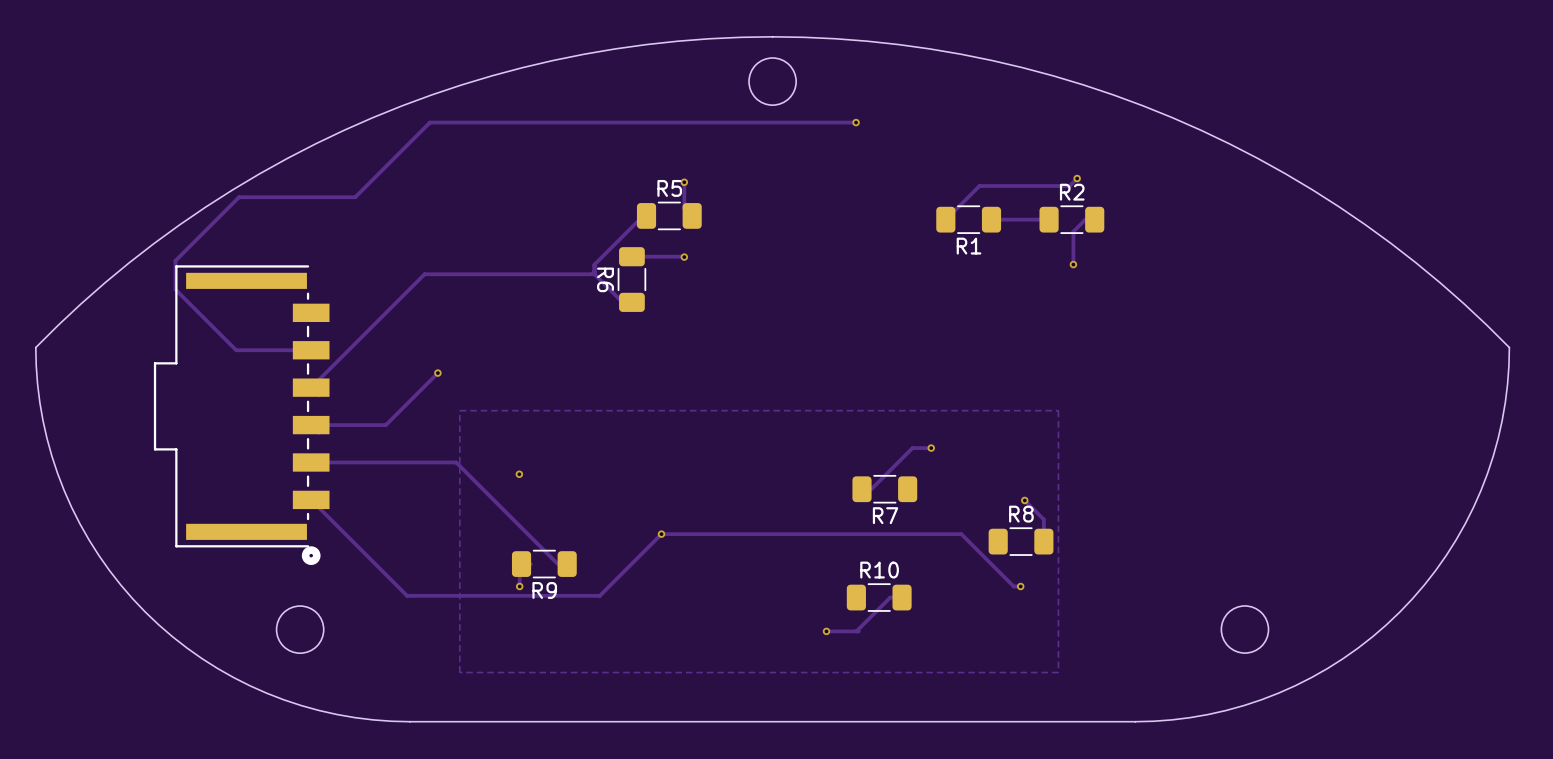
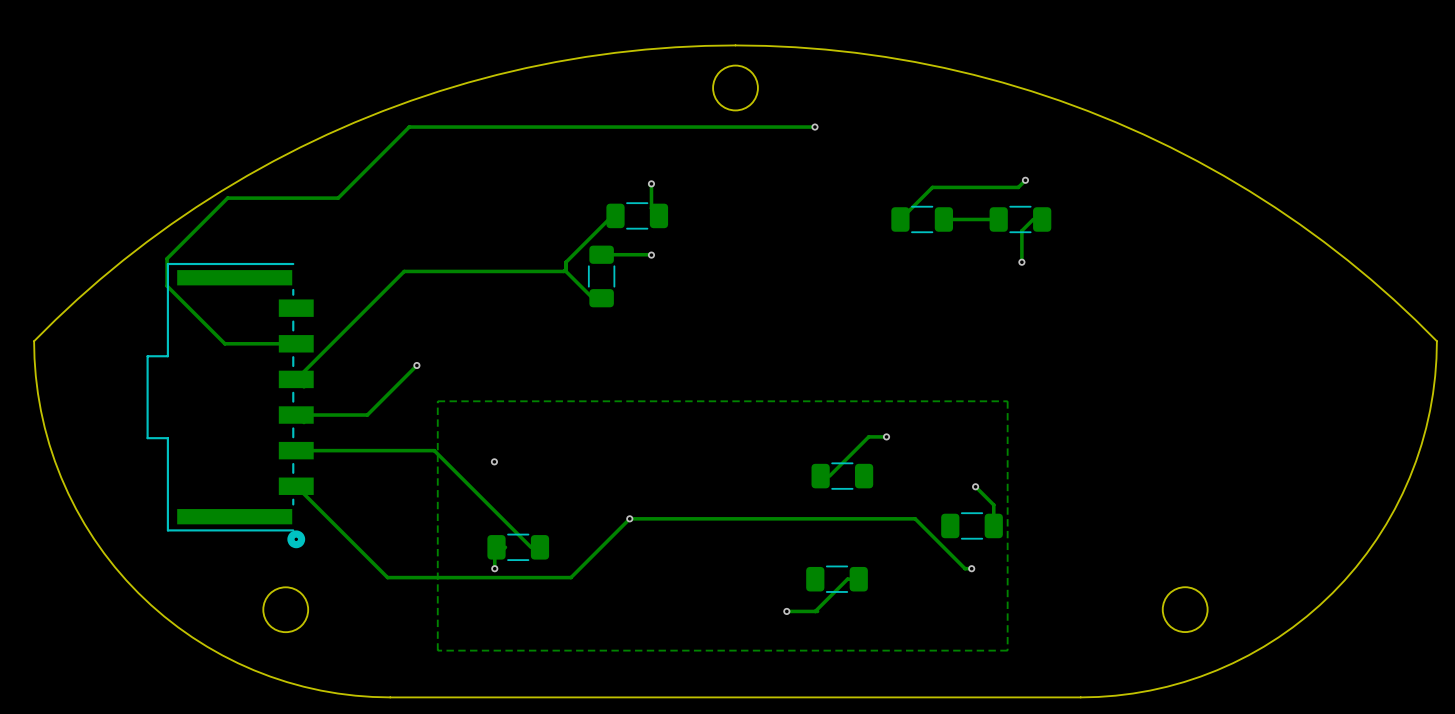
R5 name: R5 (669, 188) -> none
R2 name: R2 (1072, 192) -> none
R1 name: R1 (969, 246) -> none
R6 name: R6 (605, 279) -> none
R8 name: R8 (1021, 514) -> none
R7 name: R7 (885, 515) -> none
R10 name: R10 (879, 570) -> none
R9 name: R9 (544, 590) -> none

